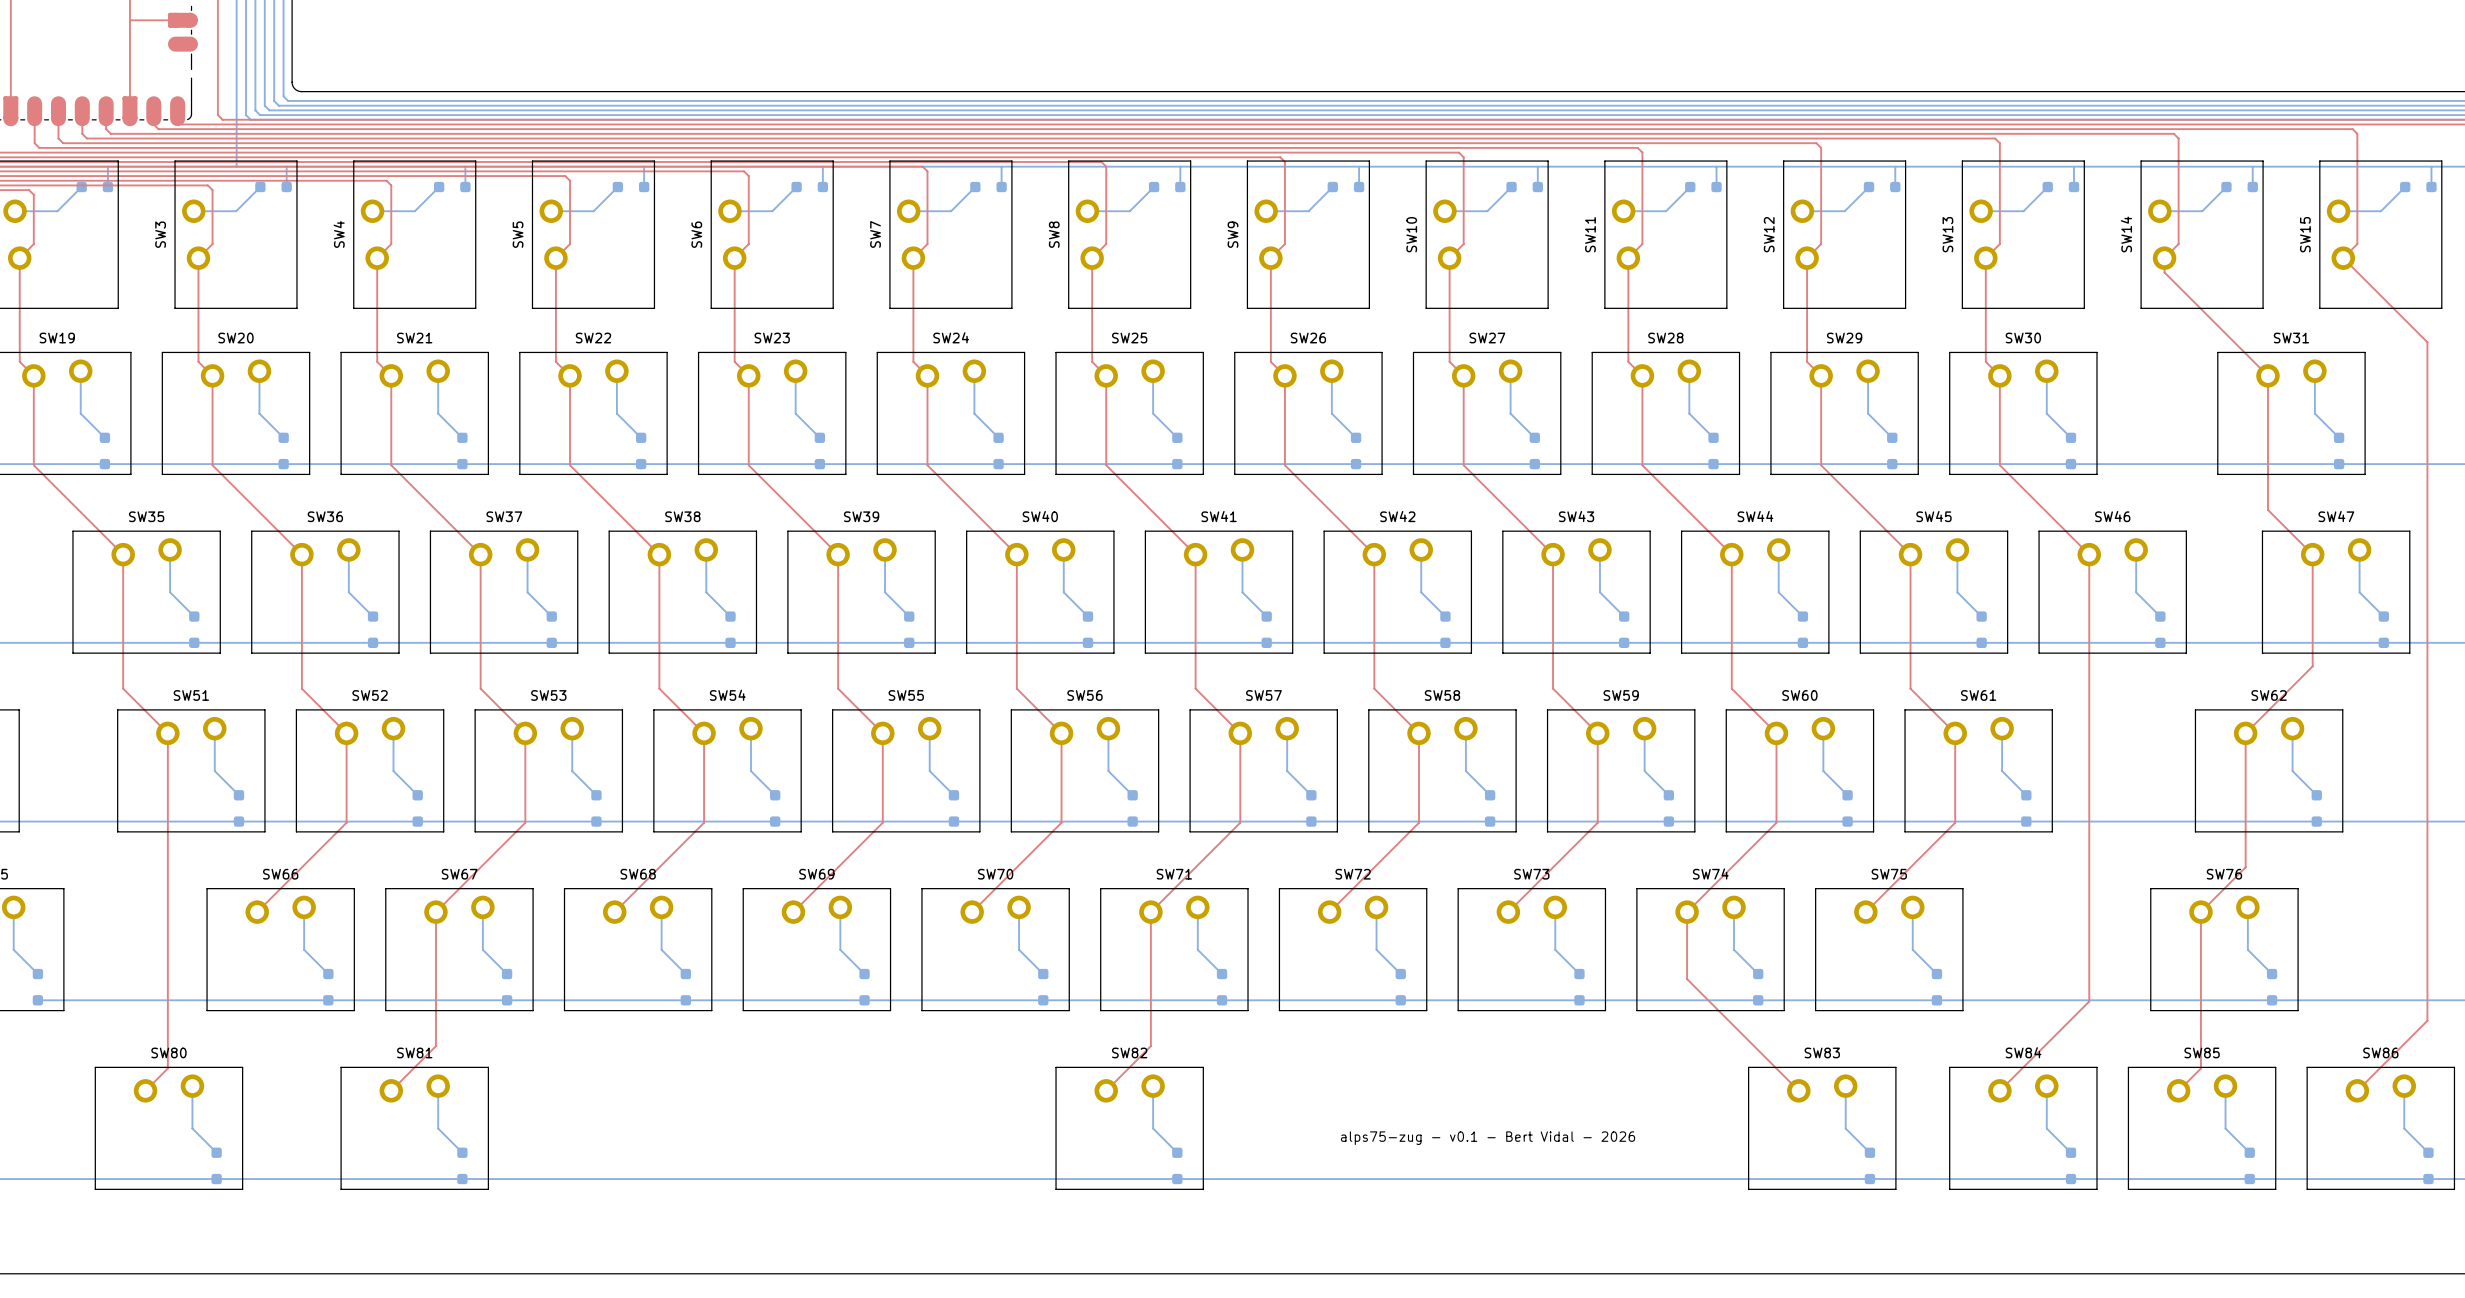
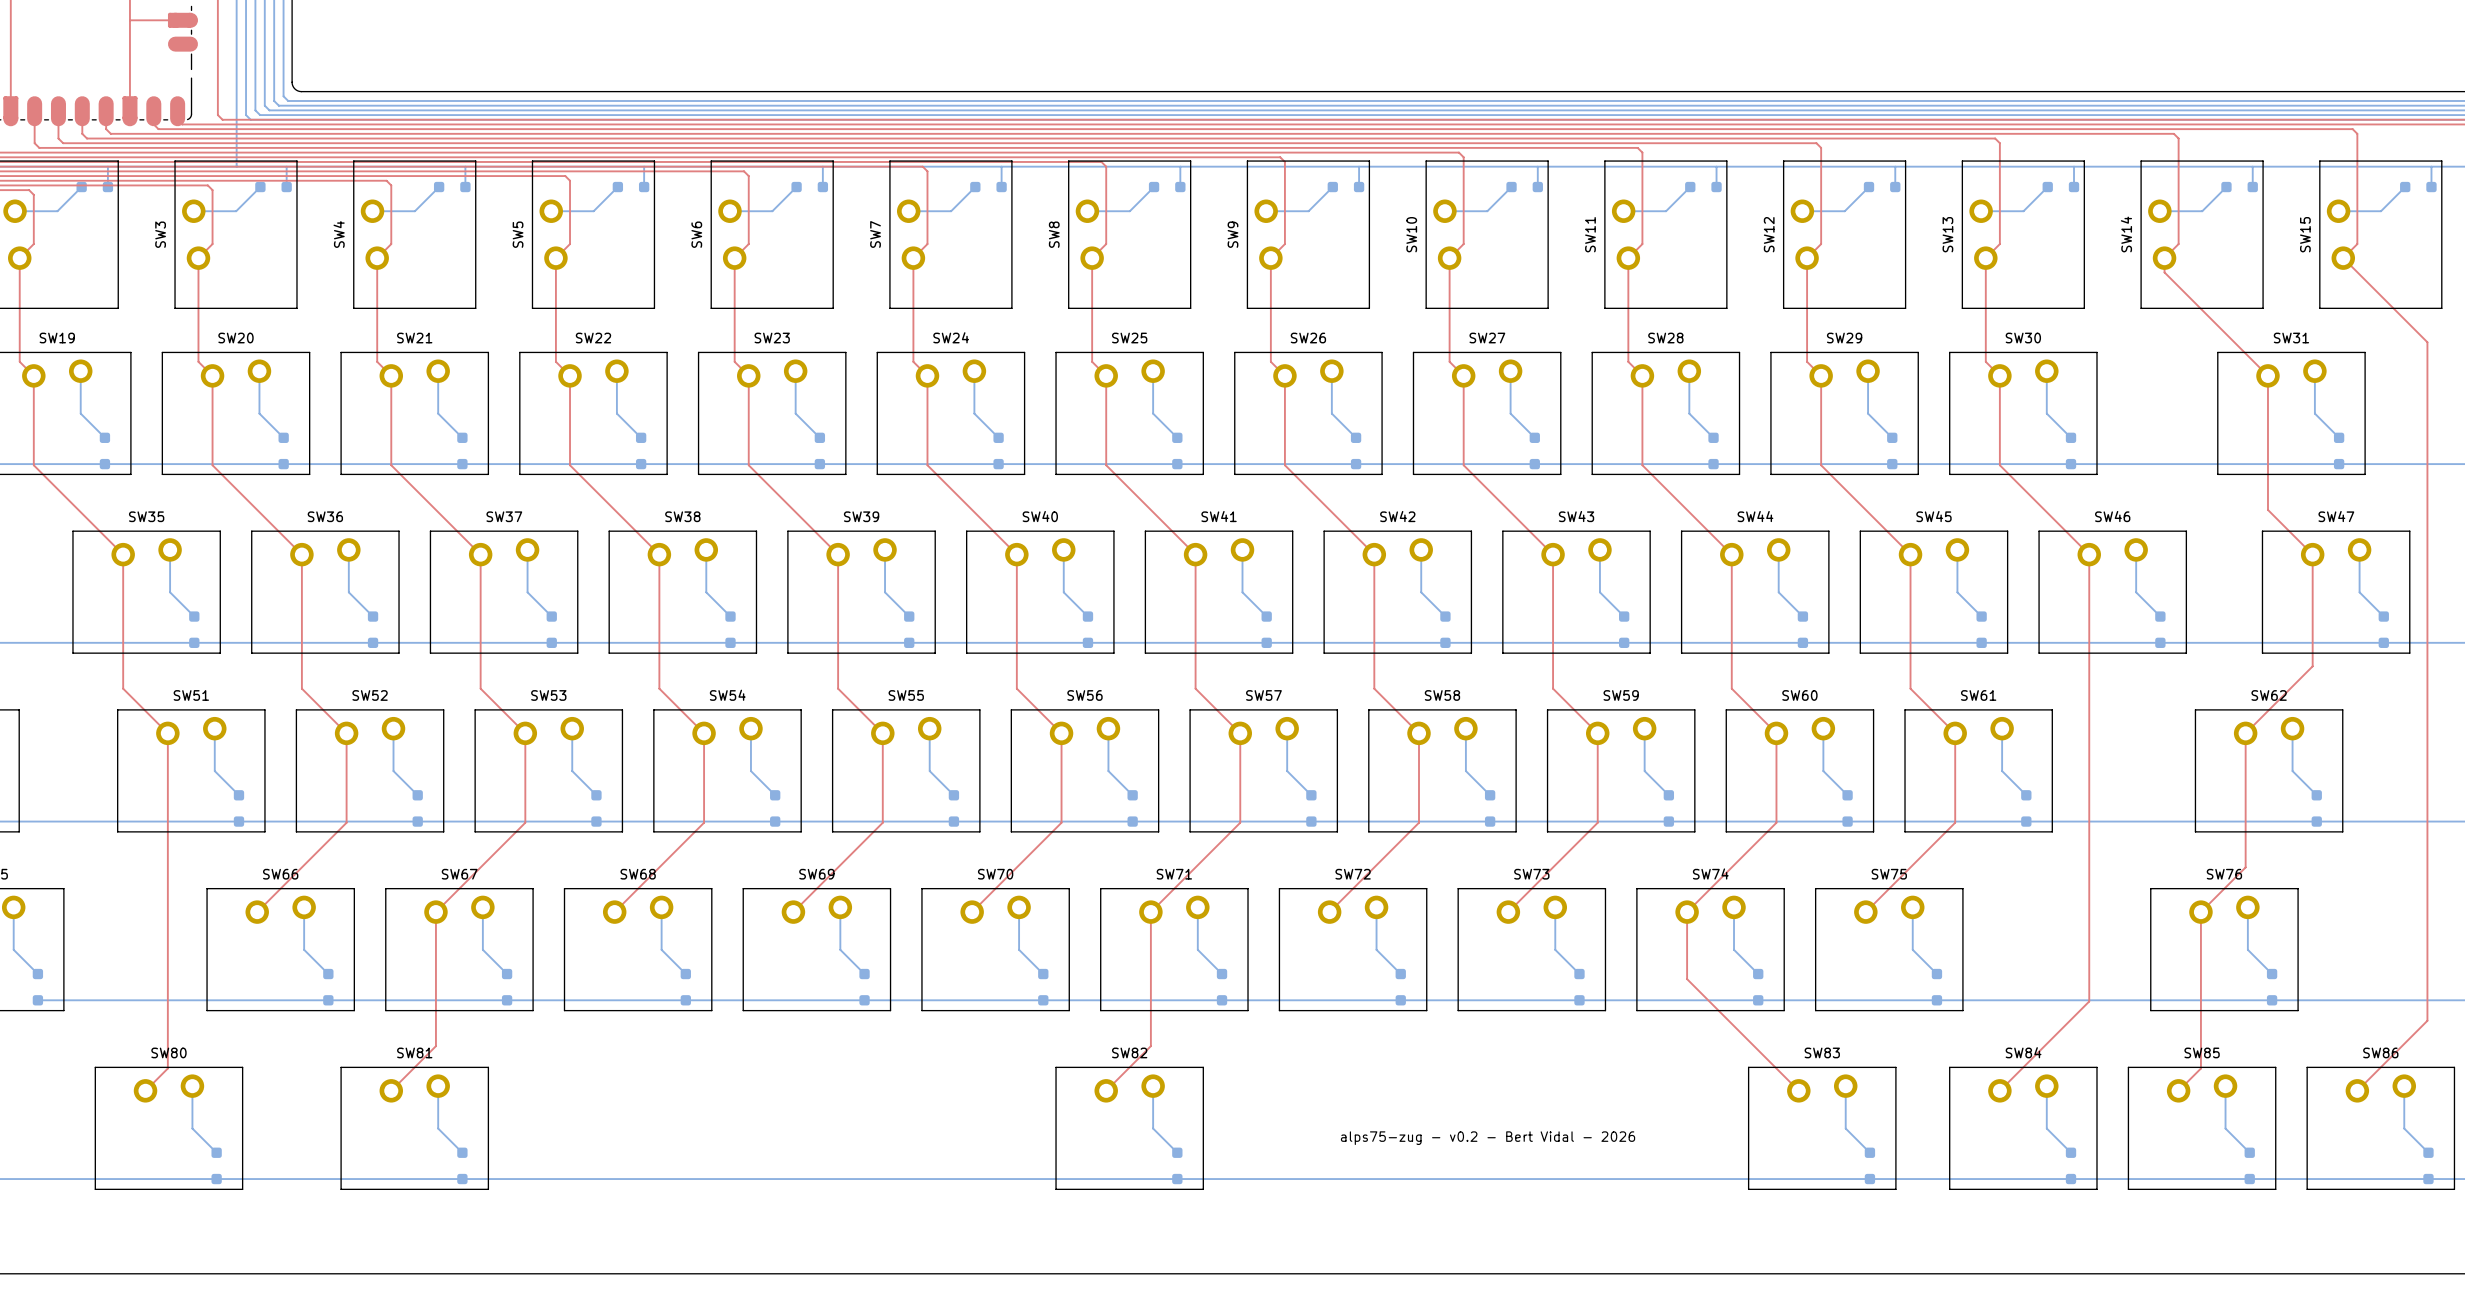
text: alps75-zug - v0.1 - Bert Vidal - 2026 (1488, 1138) -> alps75-zug - v0.2 - Bert Vidal - 2026 (1488, 1138)

